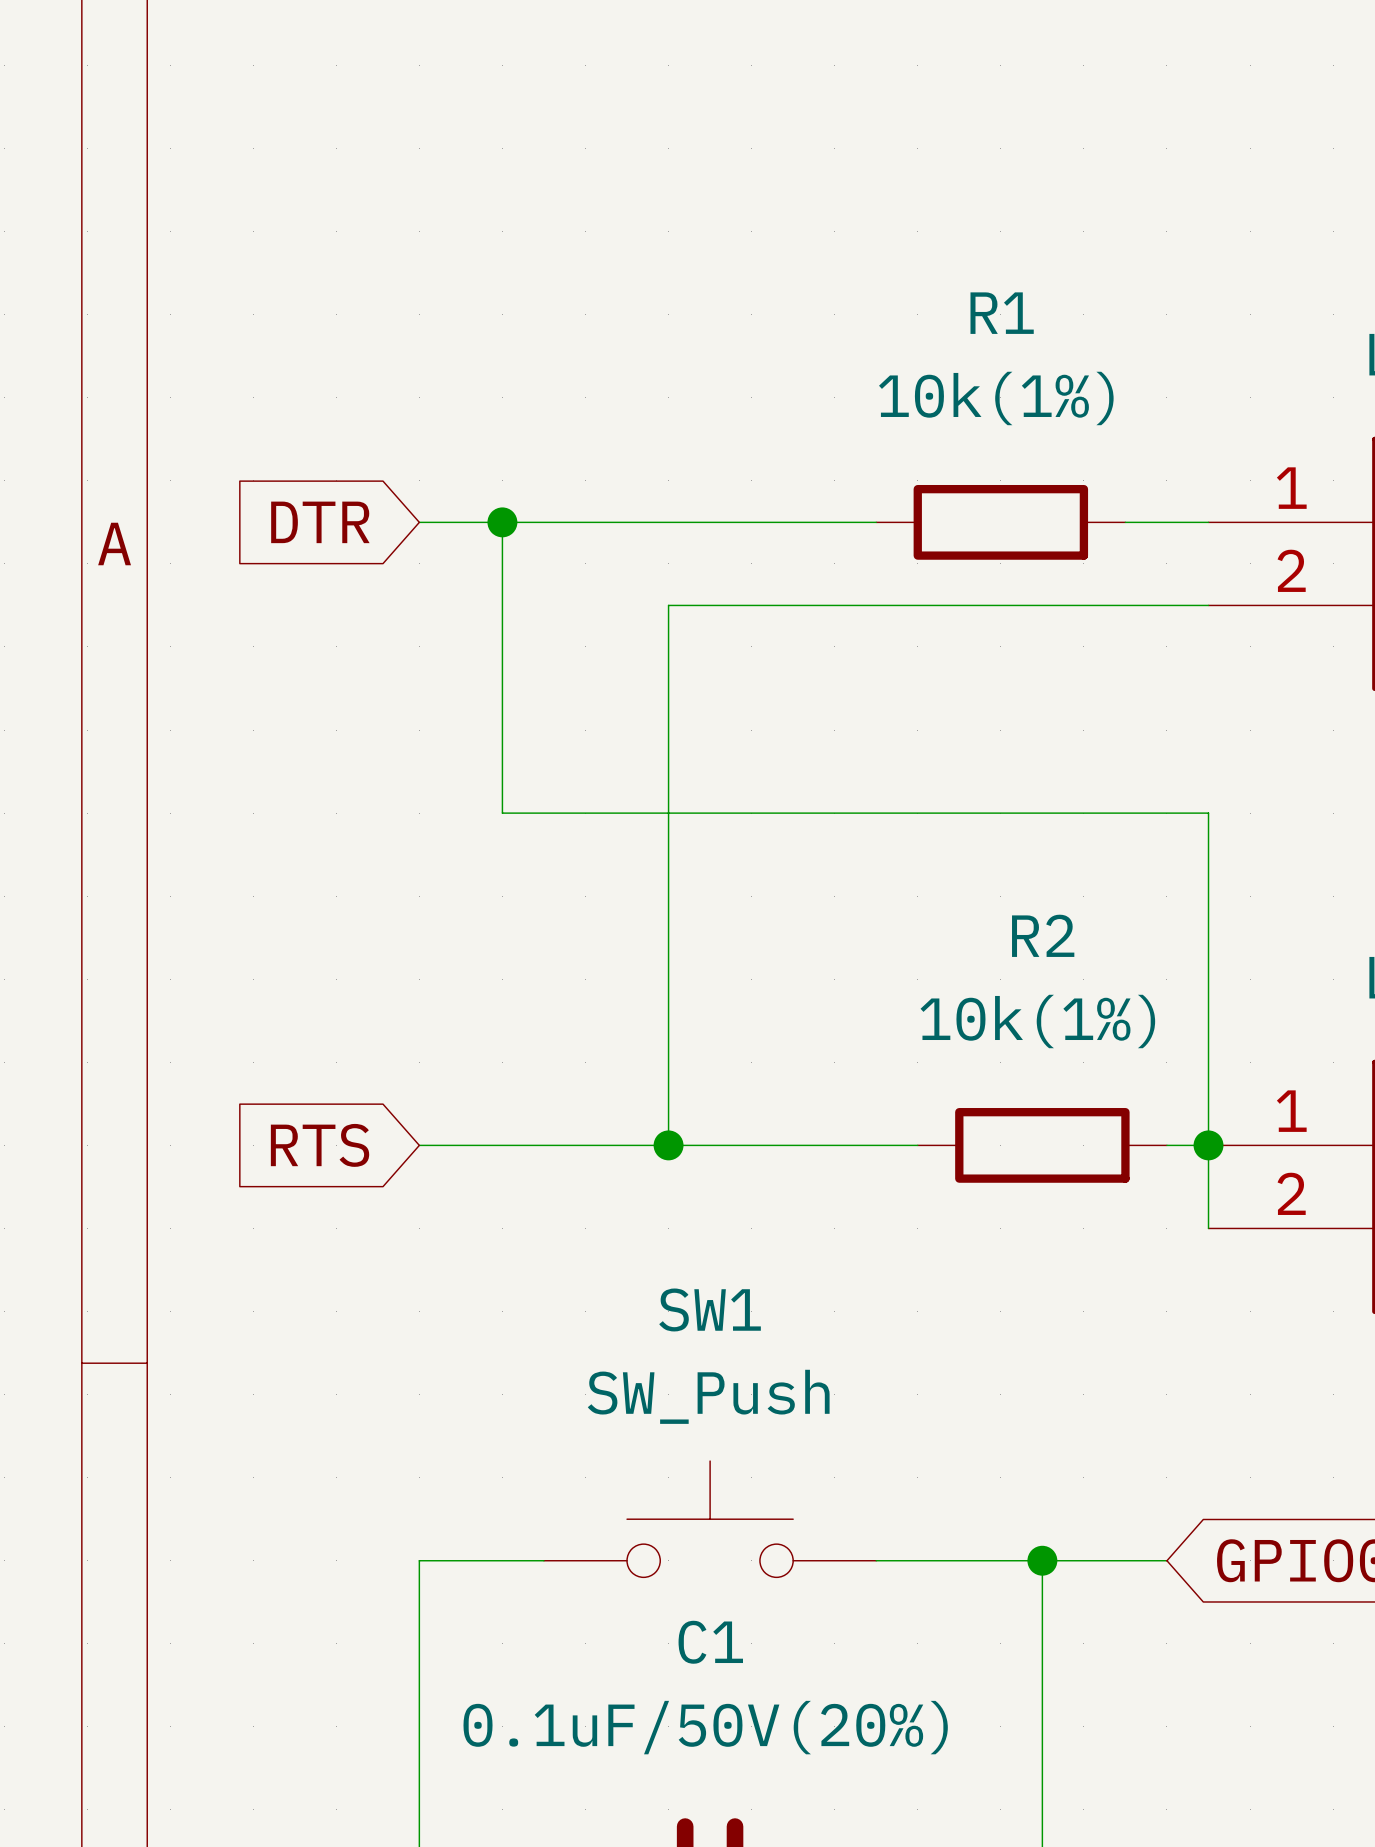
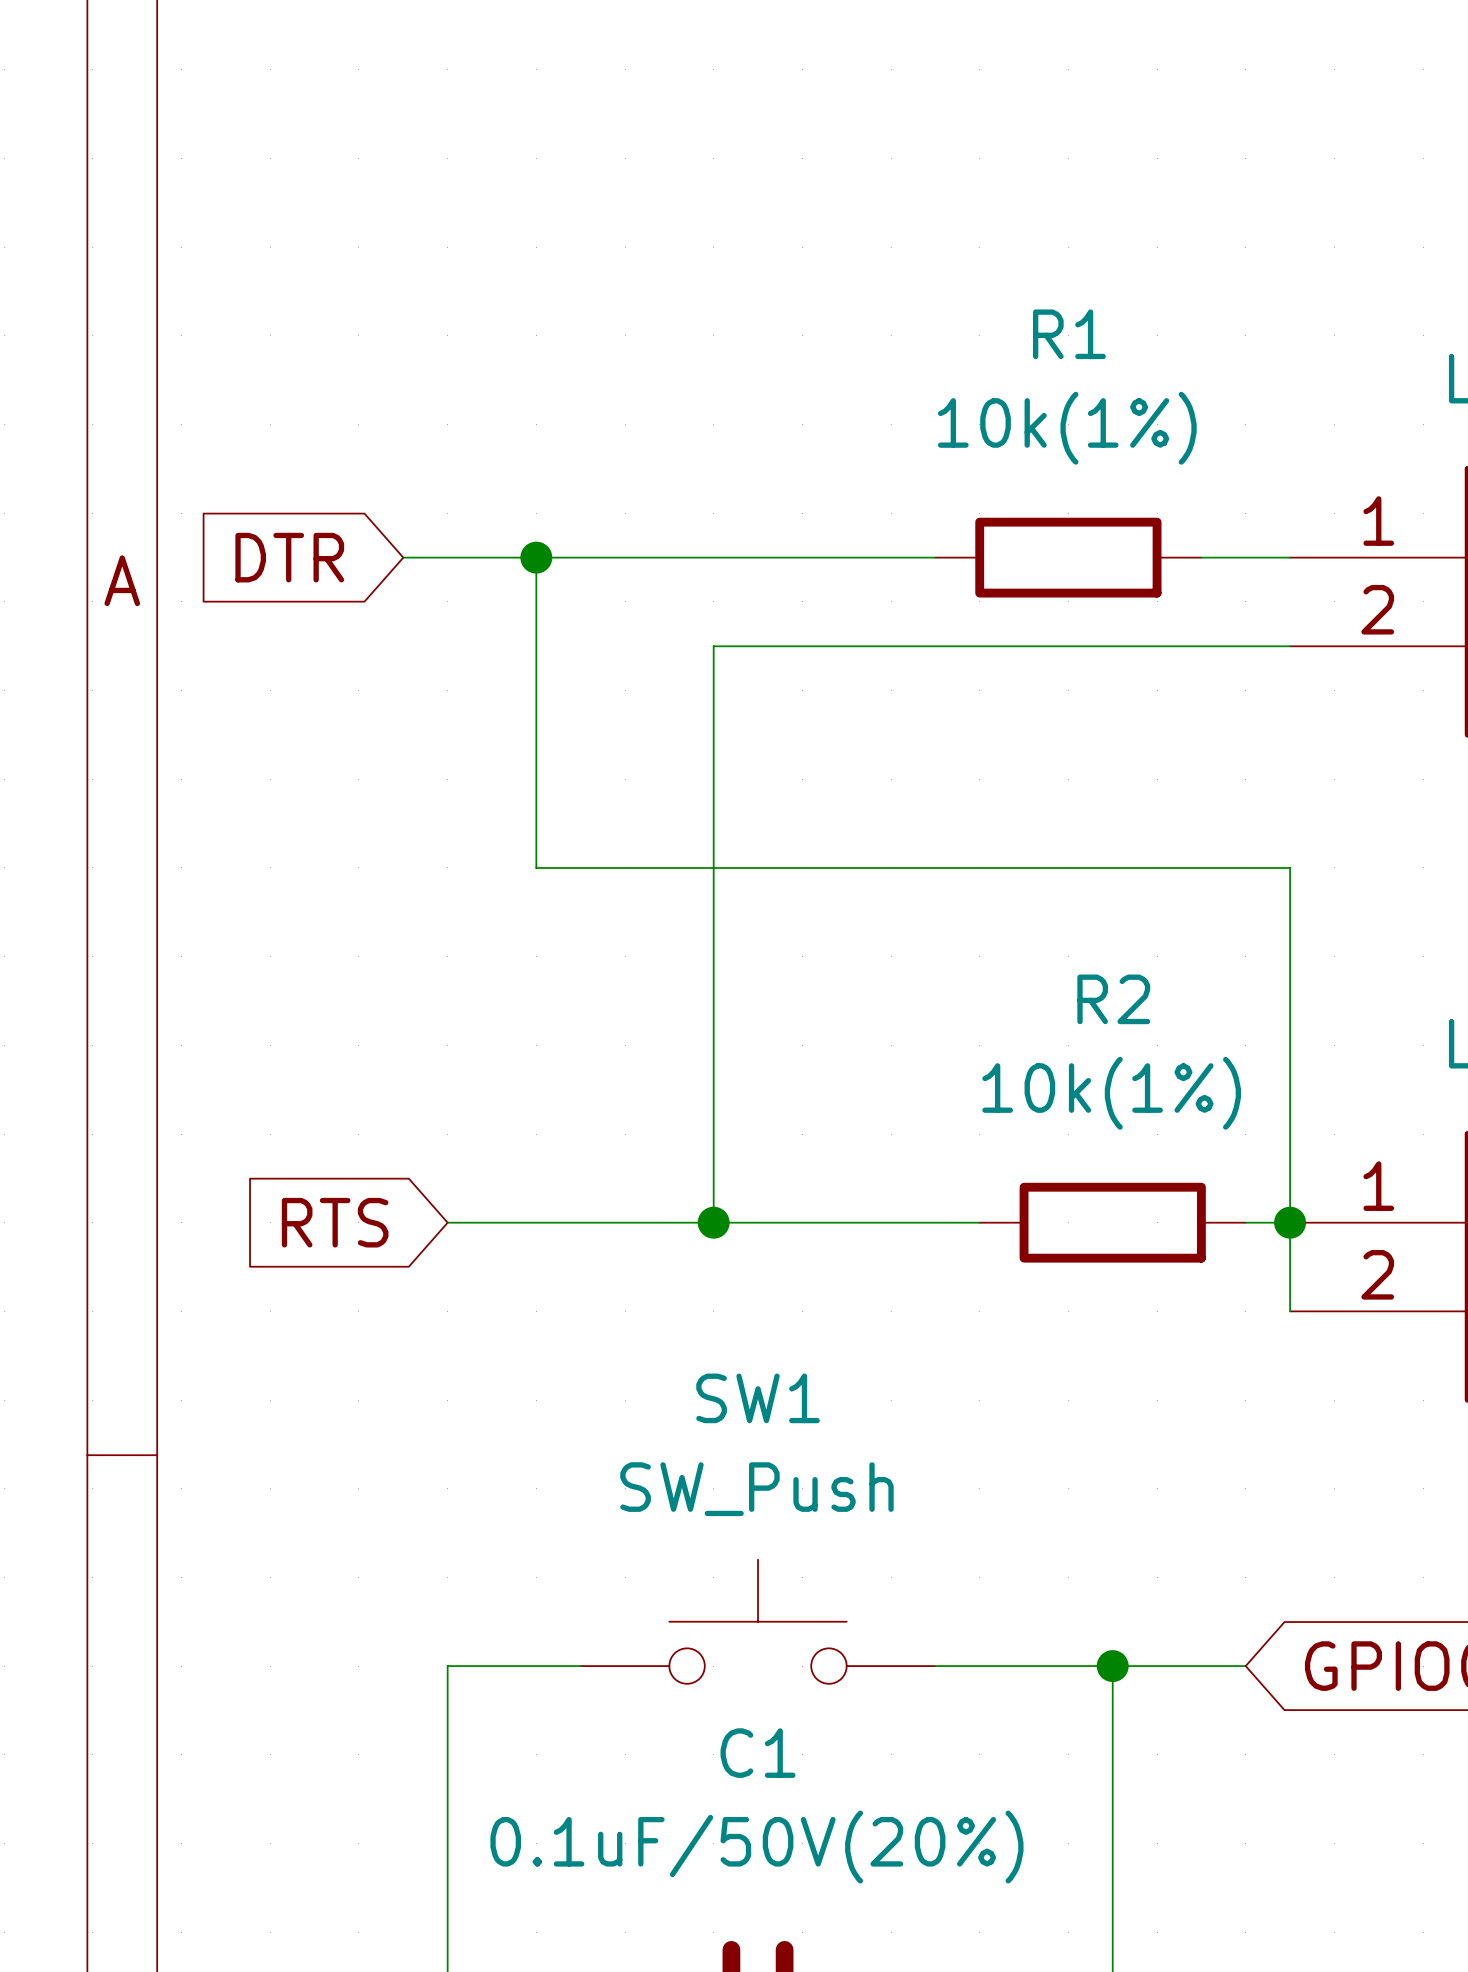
global label position: DTR (320, 522) -> DTR (289, 557)
wire: none -> (403, 557) (447, 557)

